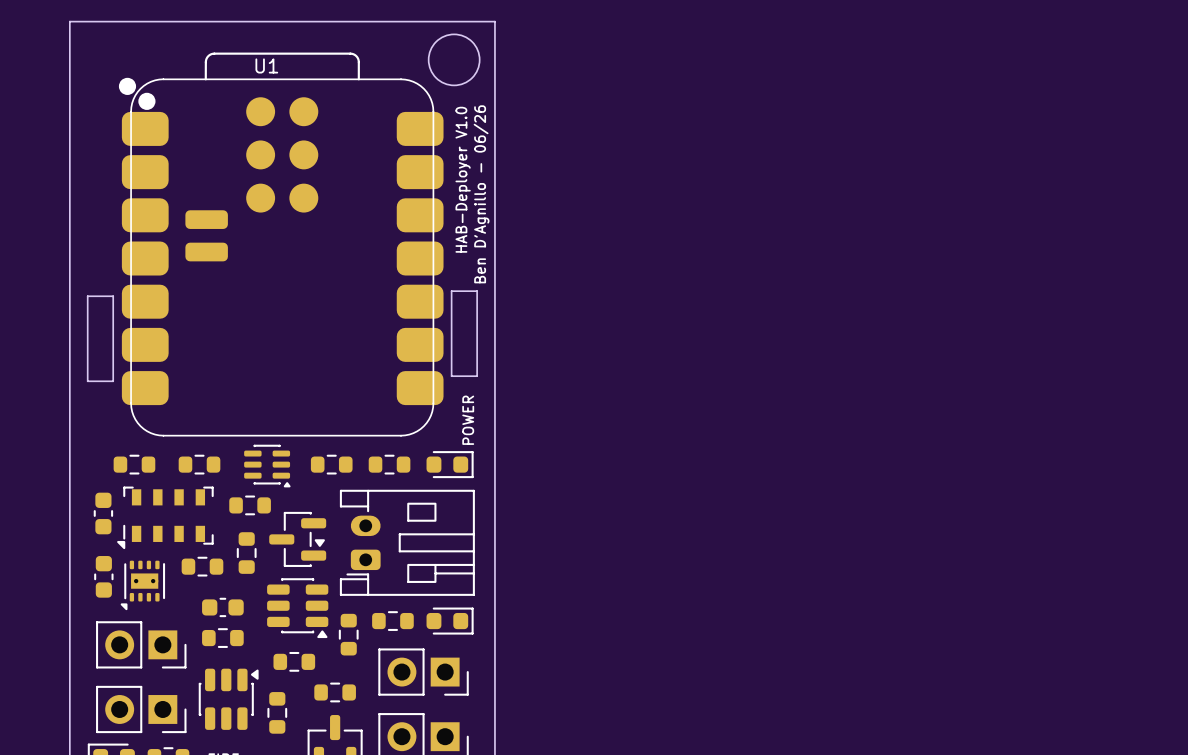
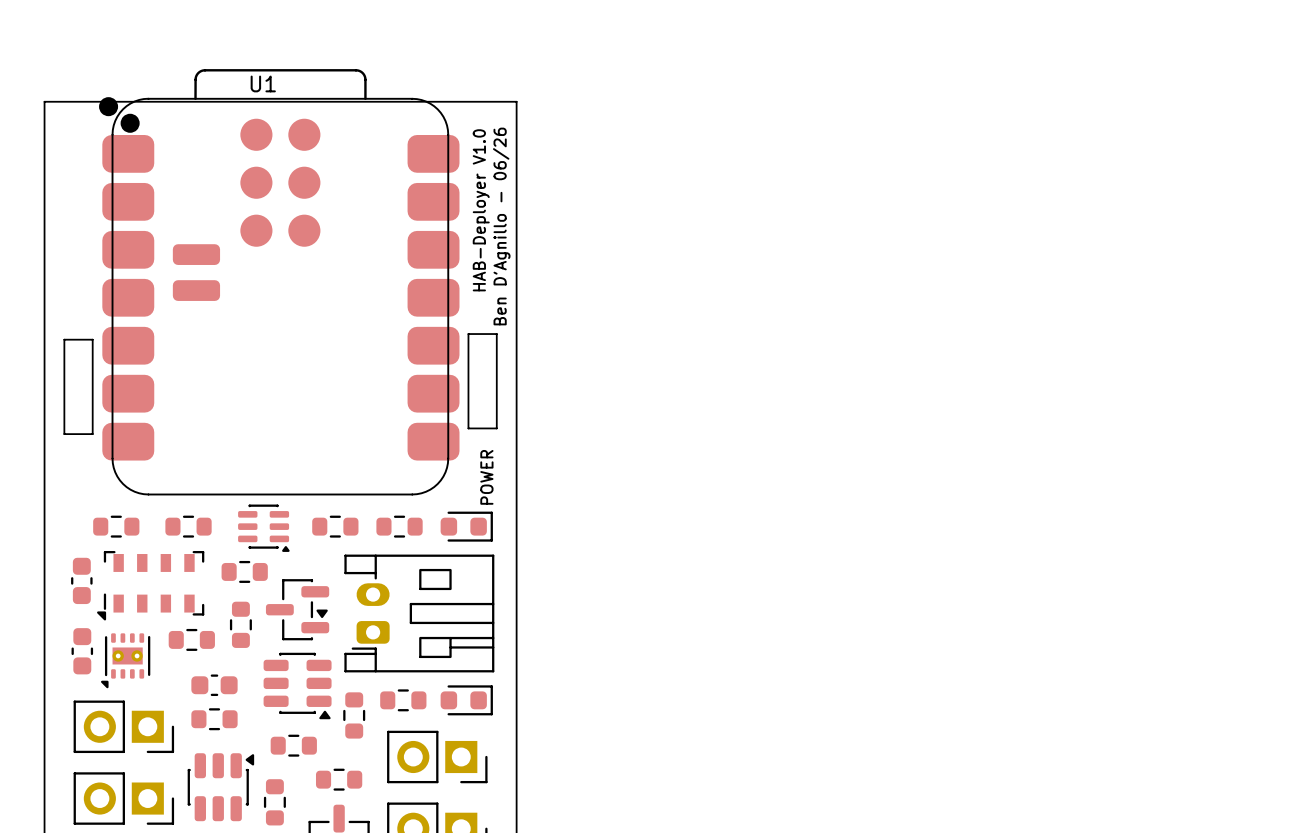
round board edge: [428, 33, 481, 86] -> none
board edge: (69, 81) (69, 21) (494, 21) (494, 81) -> (44, 101) (516, 101)

